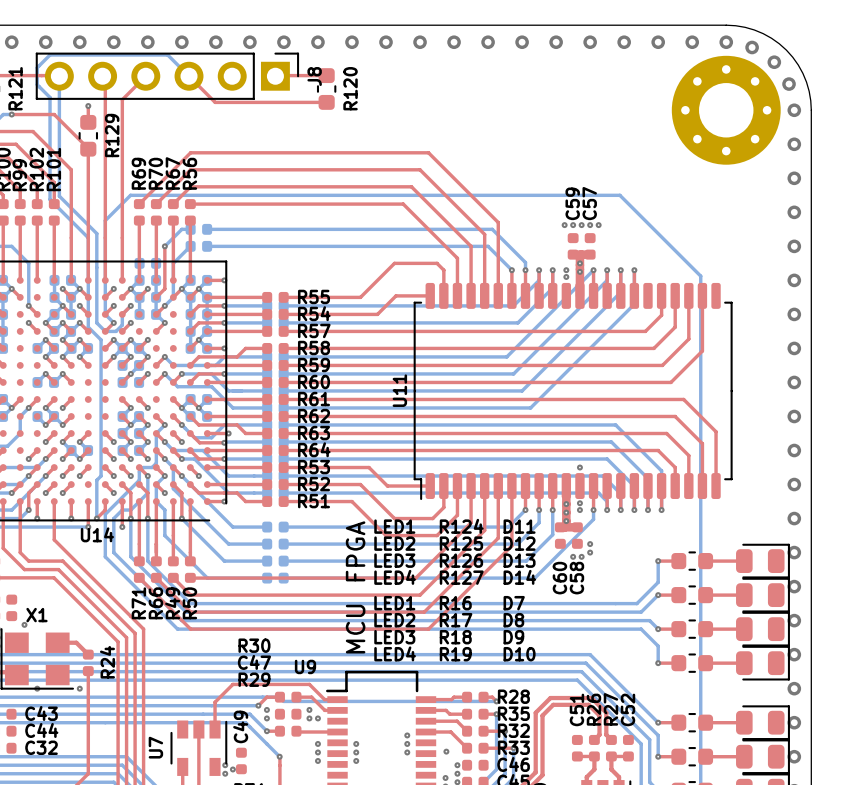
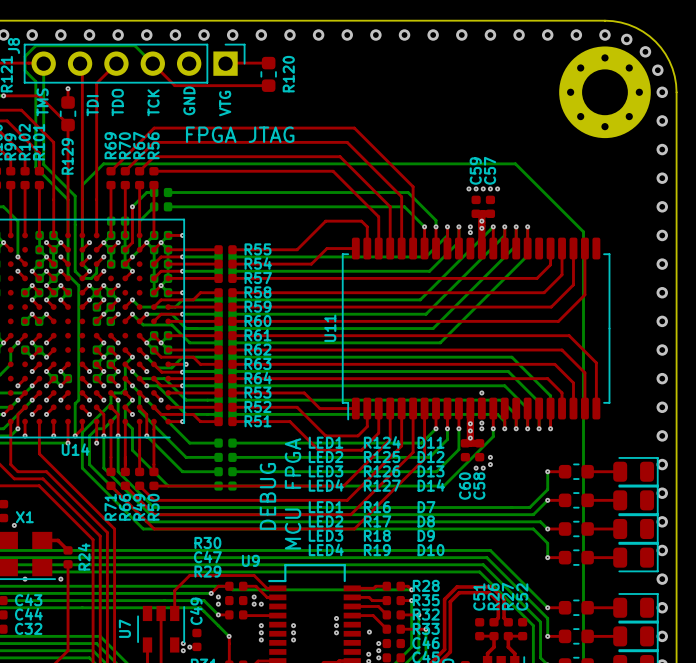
J8 name position: J8 (314, 76) -> J8 (13, 45)
text: none -> GND (189, 100)
text: none -> TMS (42, 102)
text: none -> TDO (117, 102)
text: none -> TCK (153, 102)
text: none -> VTG (225, 103)
text: none -> TDI (92, 105)
R129 name position: R129 (112, 135) -> R129 (67, 156)
text: none -> FPGA JTAG (240, 134)
text: none -> DEBUG (267, 496)

